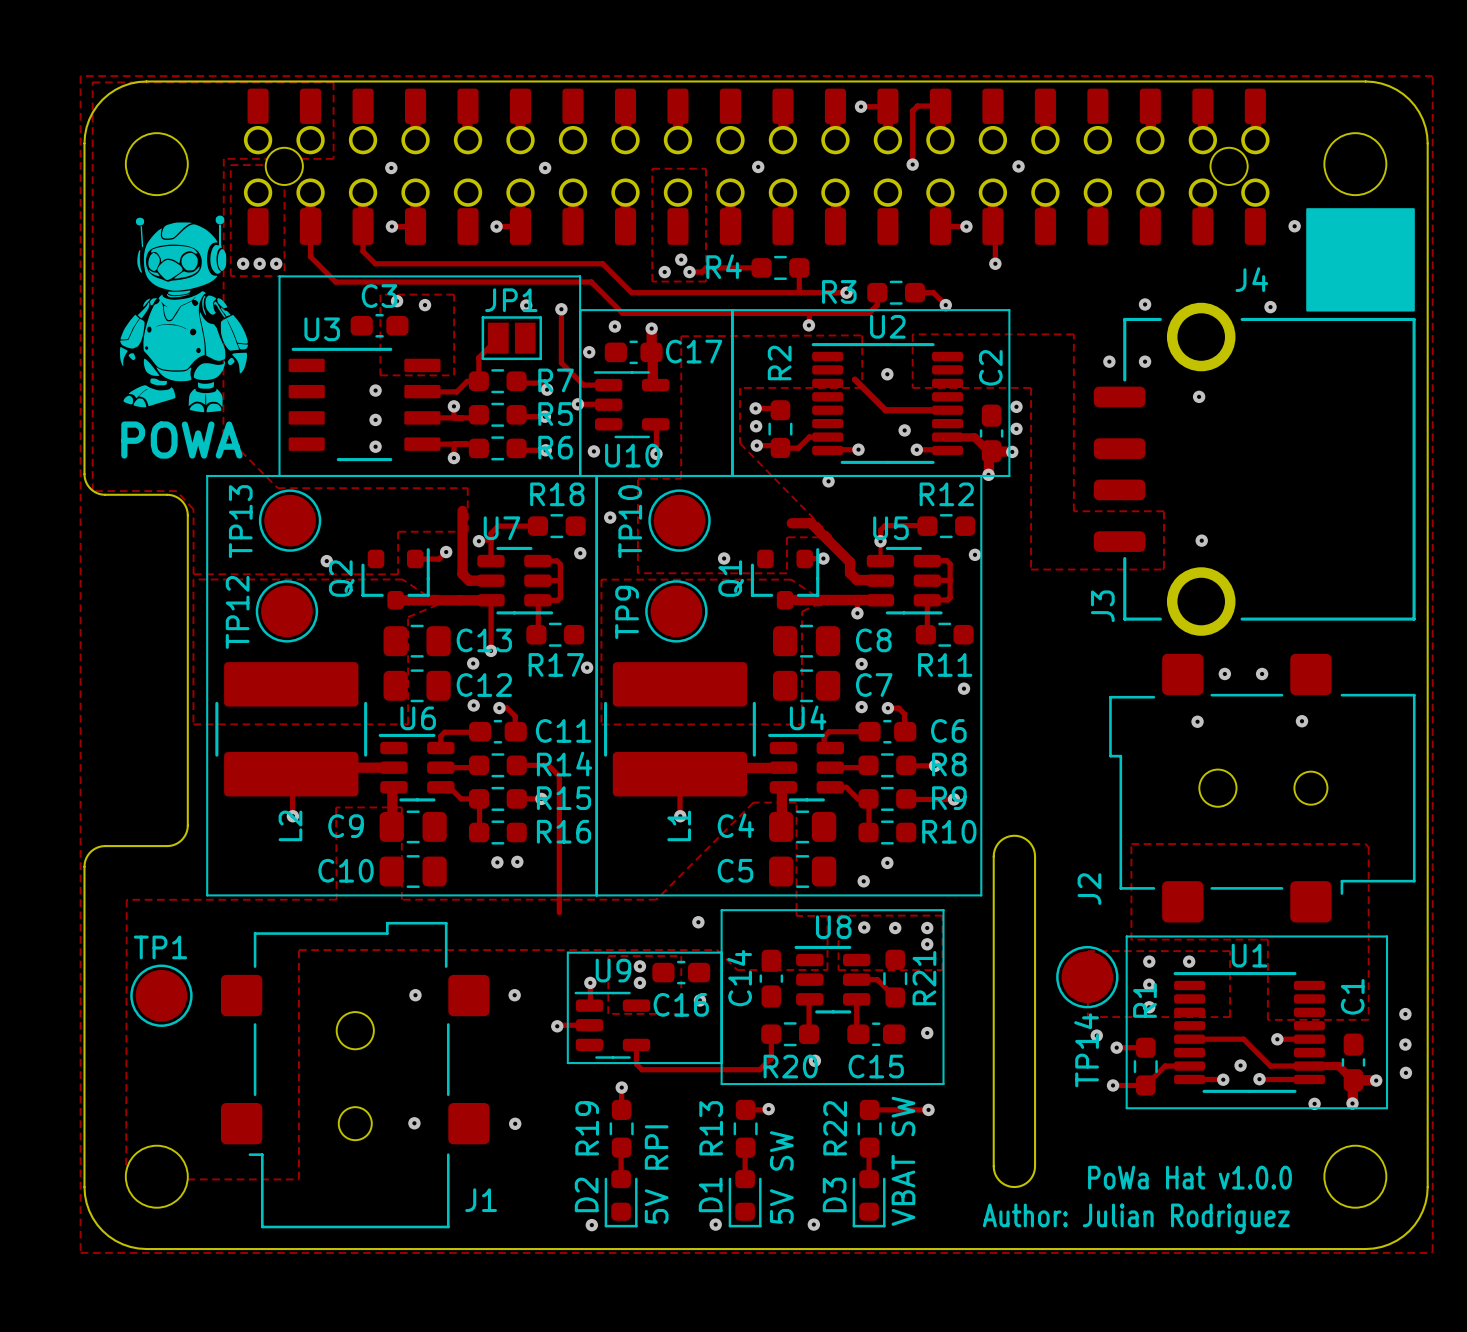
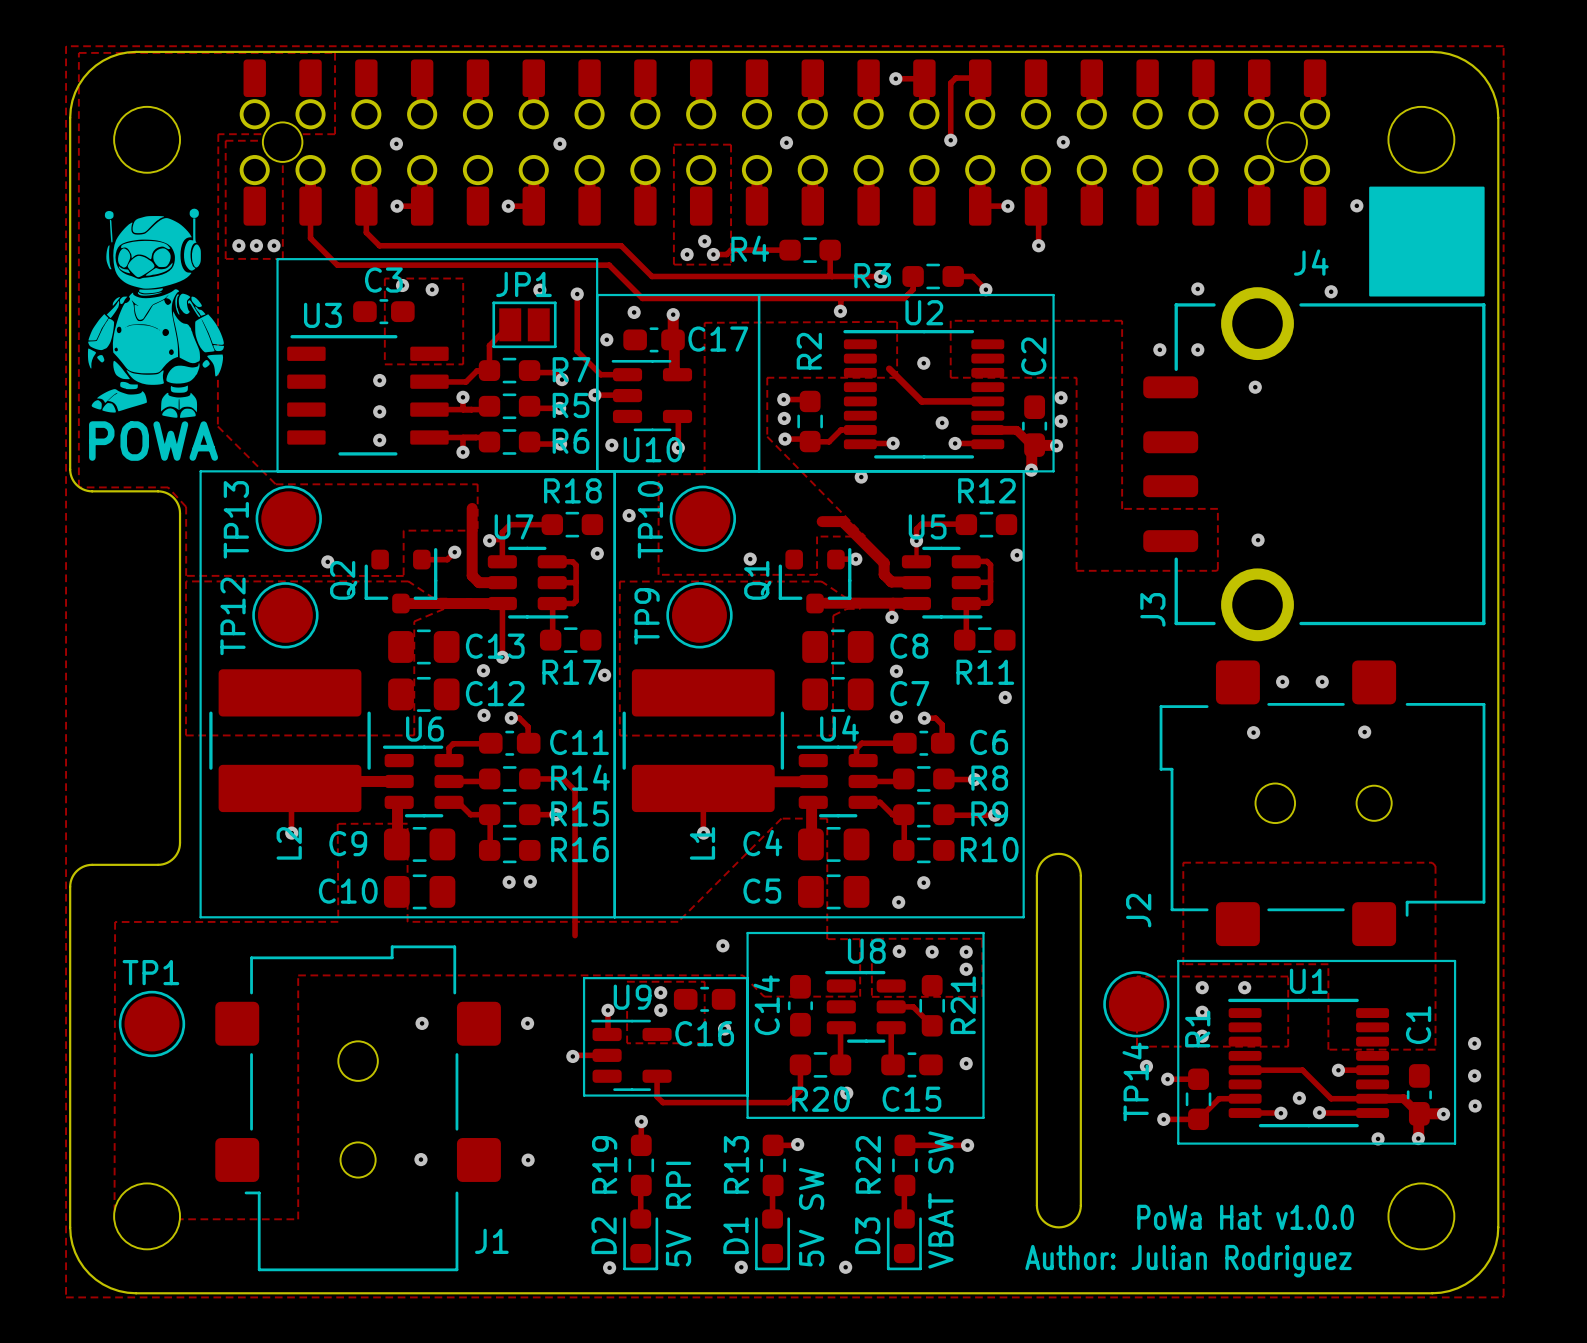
drawing: [120, 215, 248, 413] -> none
drawing: none -> [87, 208, 225, 418]

